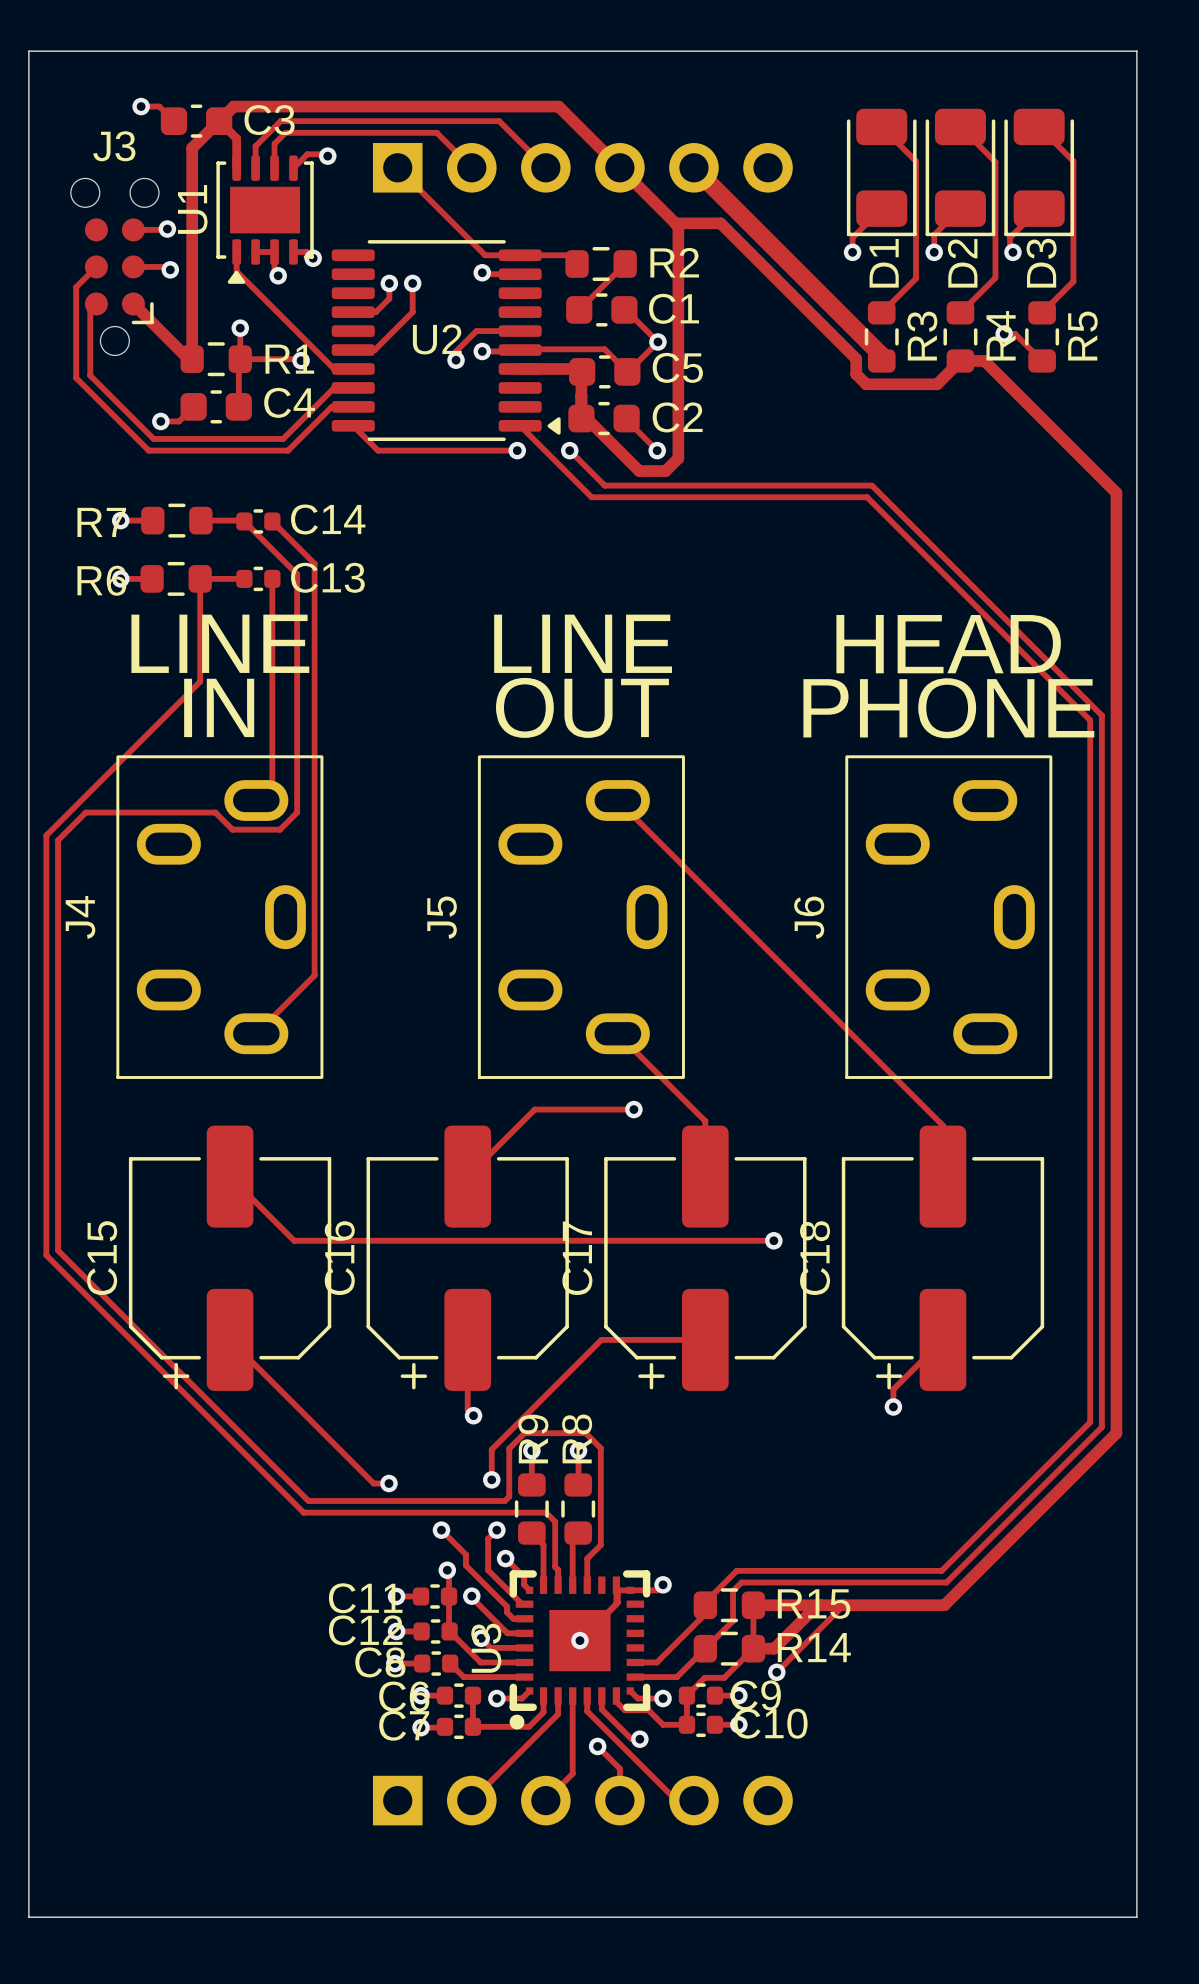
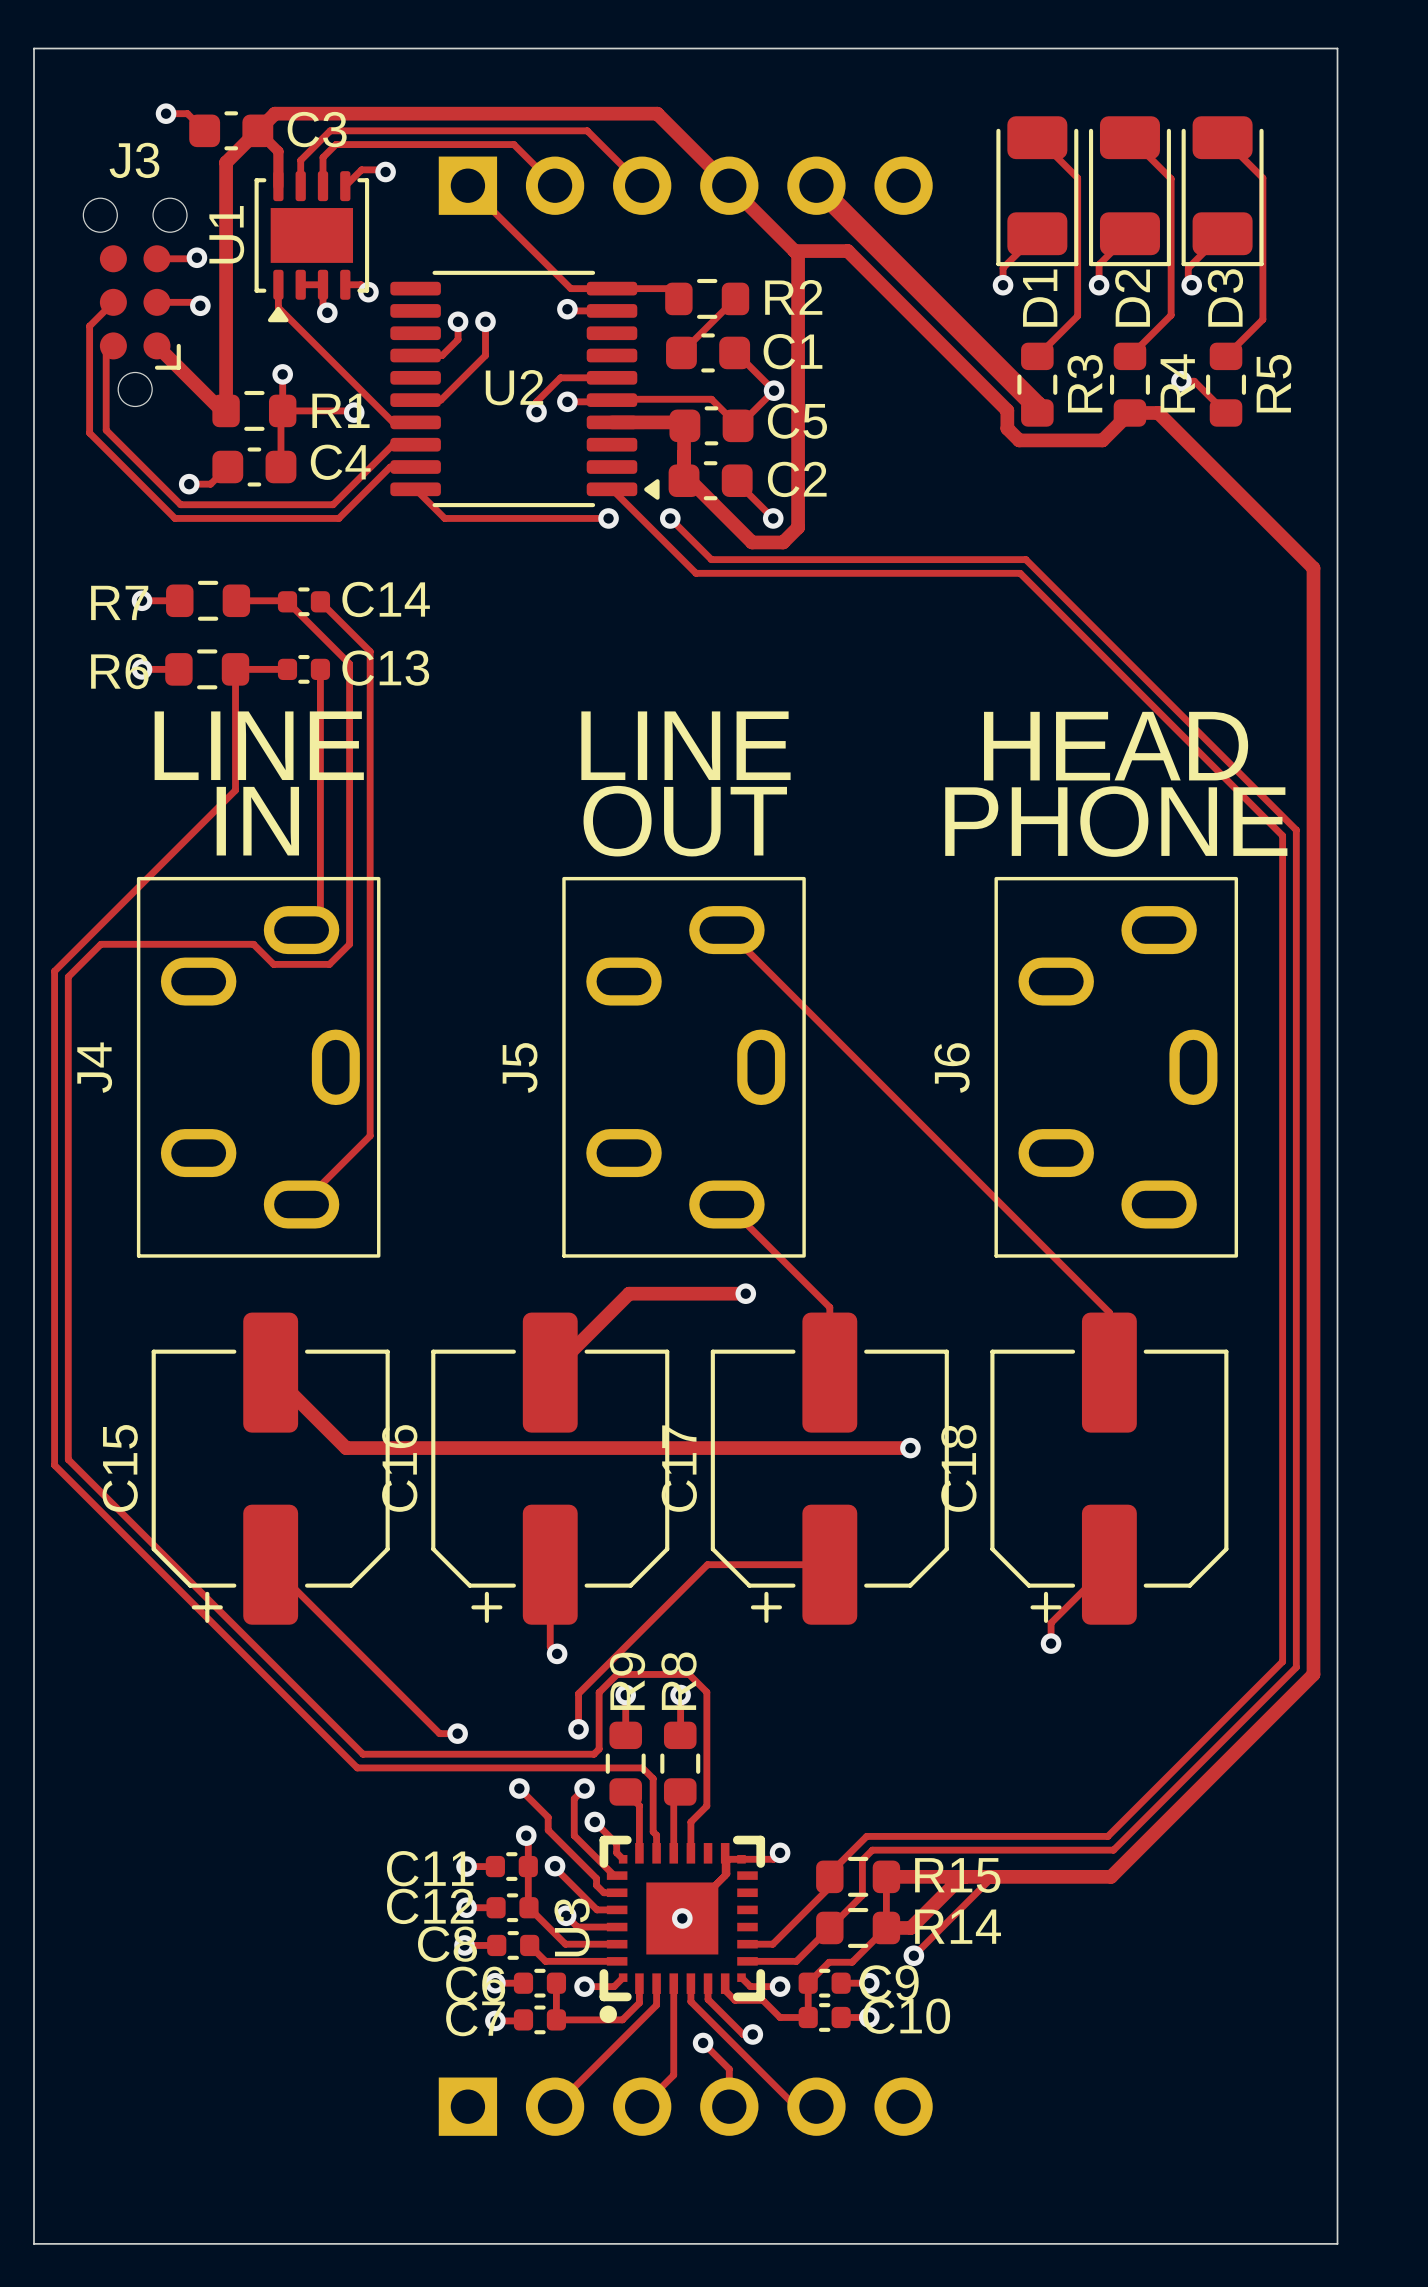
track width: thin (633, 1109) (534, 1109) (467, 1176) -> thick (745, 1293) (629, 1293) (550, 1372)
track width: thin (230, 1176) (294, 1240) (773, 1240) -> thick (270, 1372) (346, 1448) (910, 1448)

